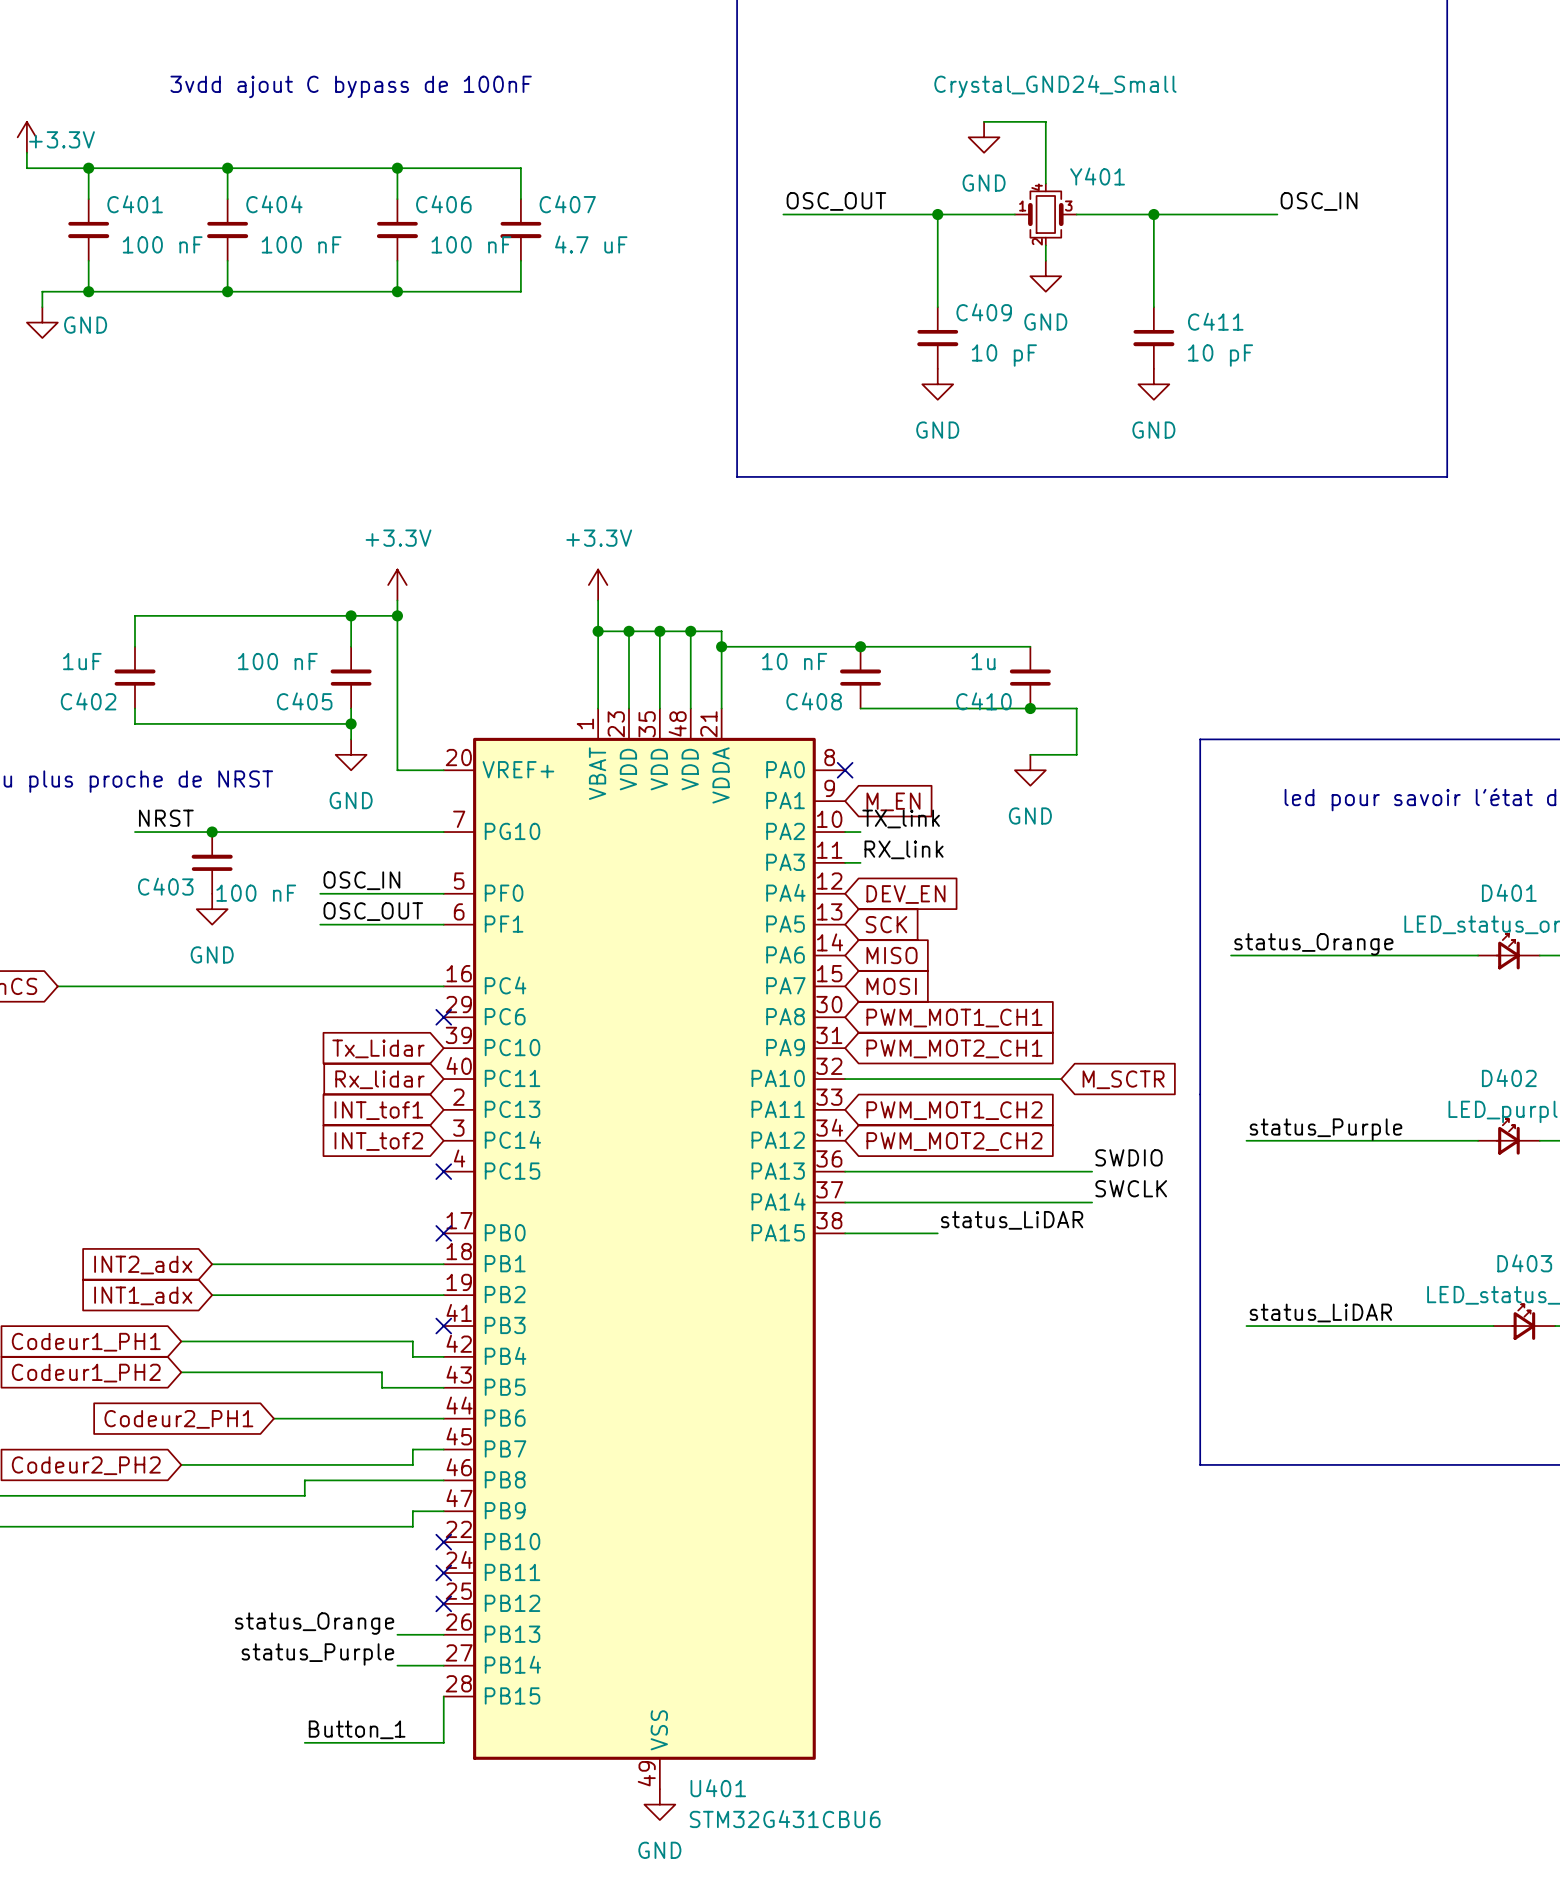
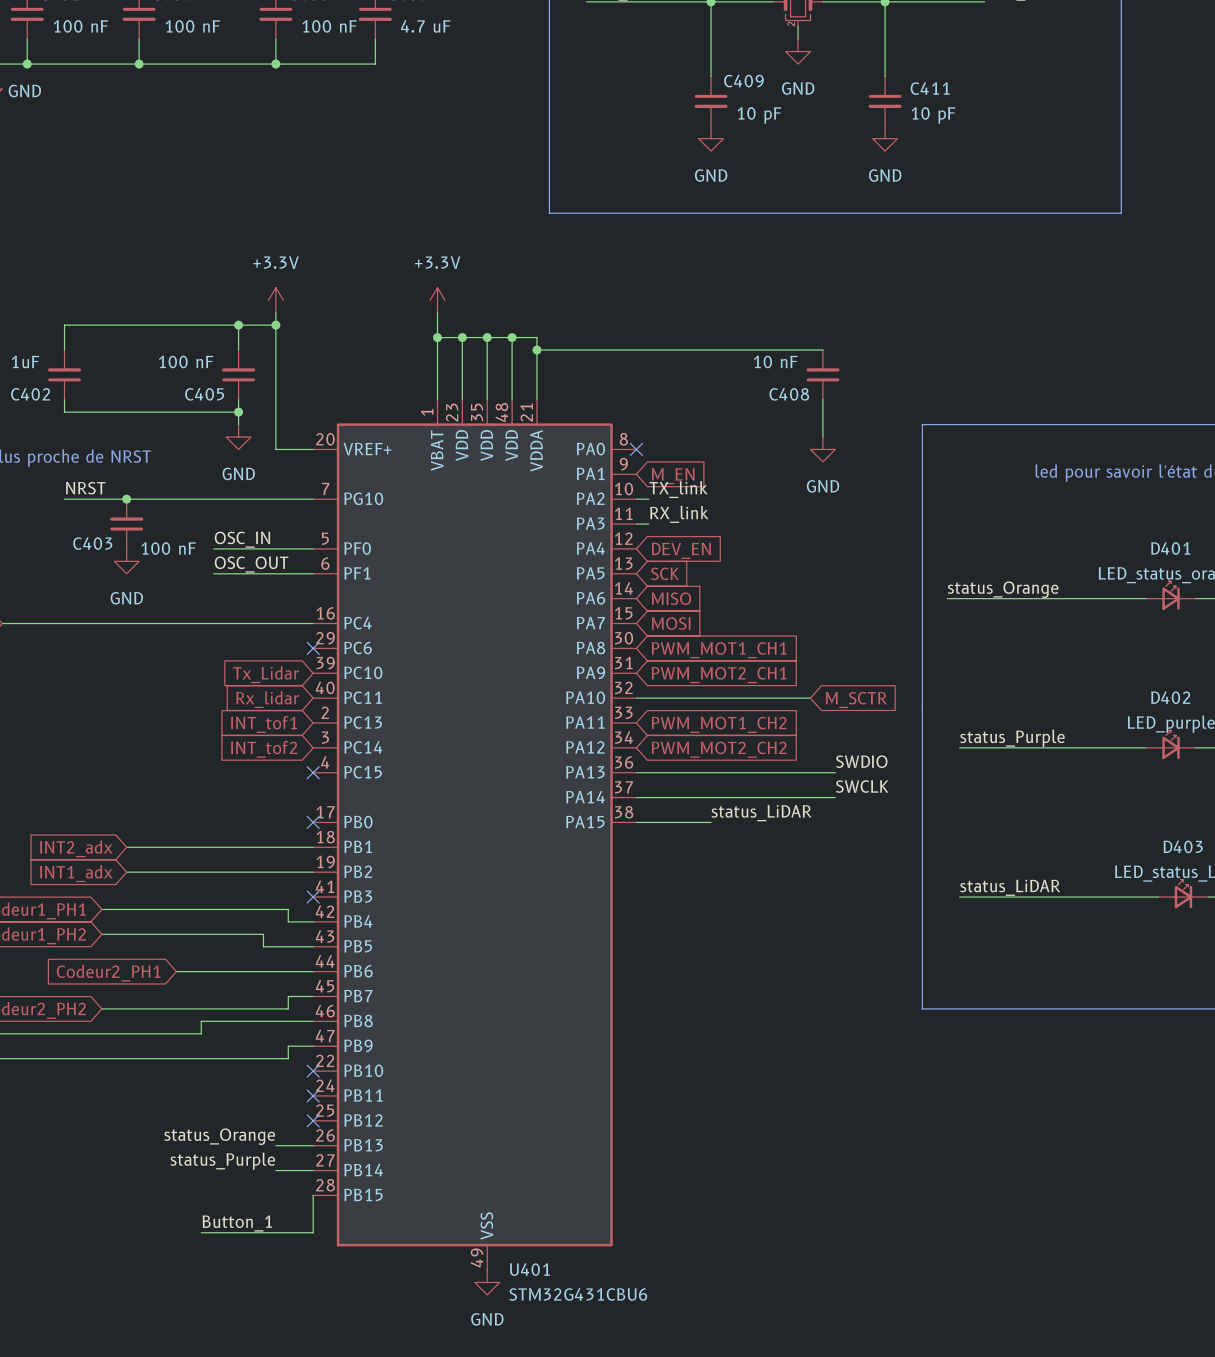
junction: (860, 646) -> none
C408 position: (860, 677) -> (822, 374)
C410: 1u (1030, 677) -> none
wire: (860, 708) (1076, 708) -> none
junction: (1030, 708) -> none
wire: (1030, 754) (1076, 754) -> (785, 350) (822, 350)
power symbol position: GND (1030, 770) -> GND (822, 449)

